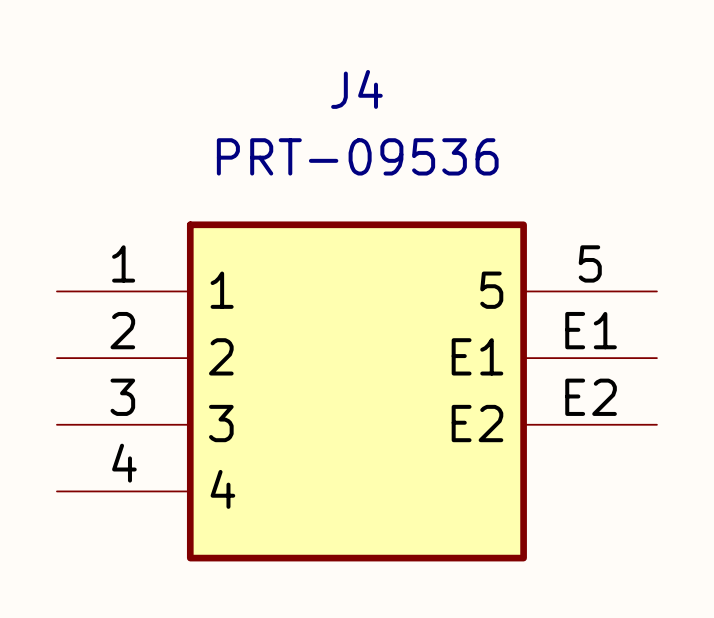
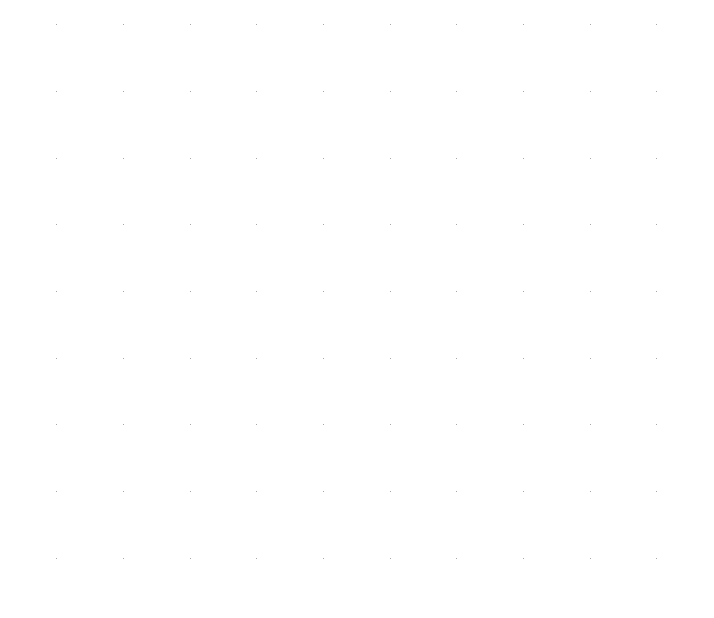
J4: PRT-09536 (356, 391) -> none

